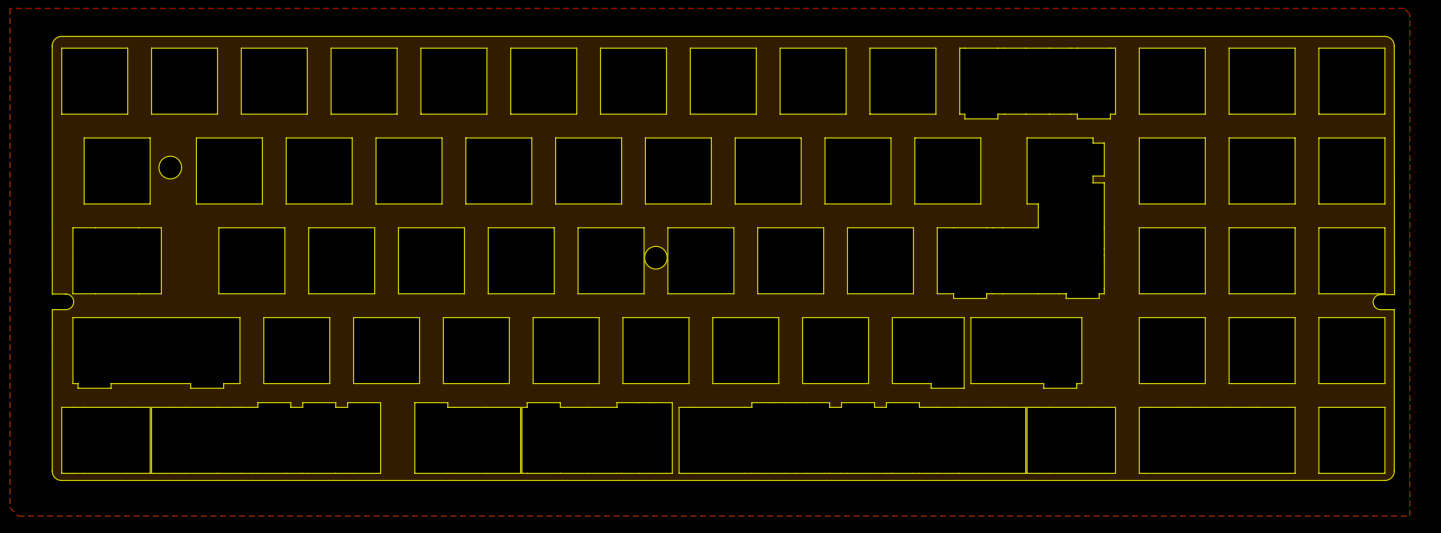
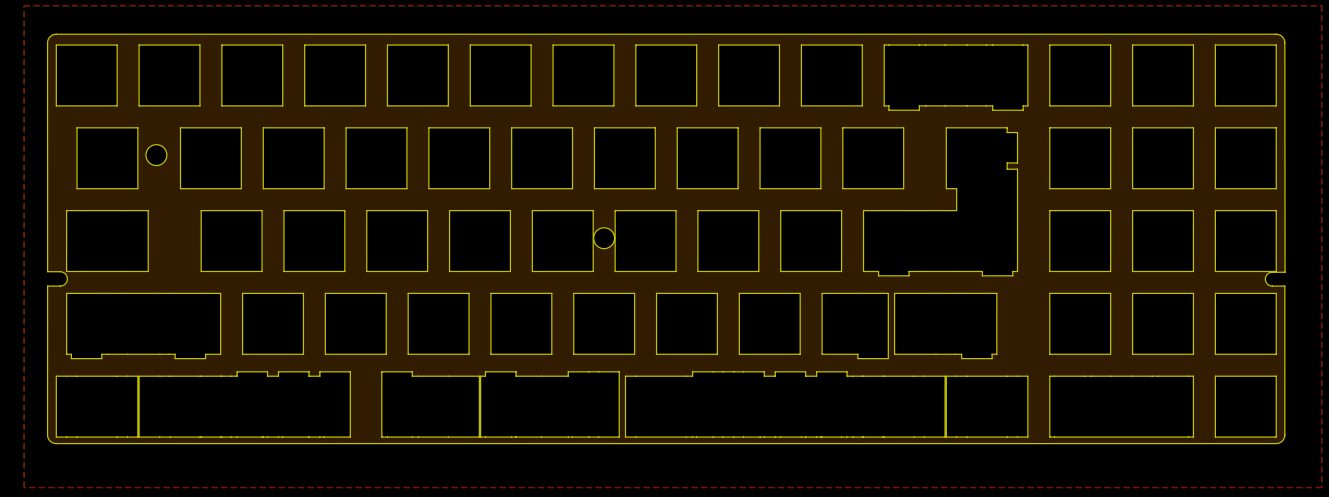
top zone outline: (10, 8) (1404, 8) (1409, 13) (1409, 516) (18, 516) (10, 507) (10, 8) -> (24, 5) (24, 487) (1321, 487) (1321, 5) (24, 5)

